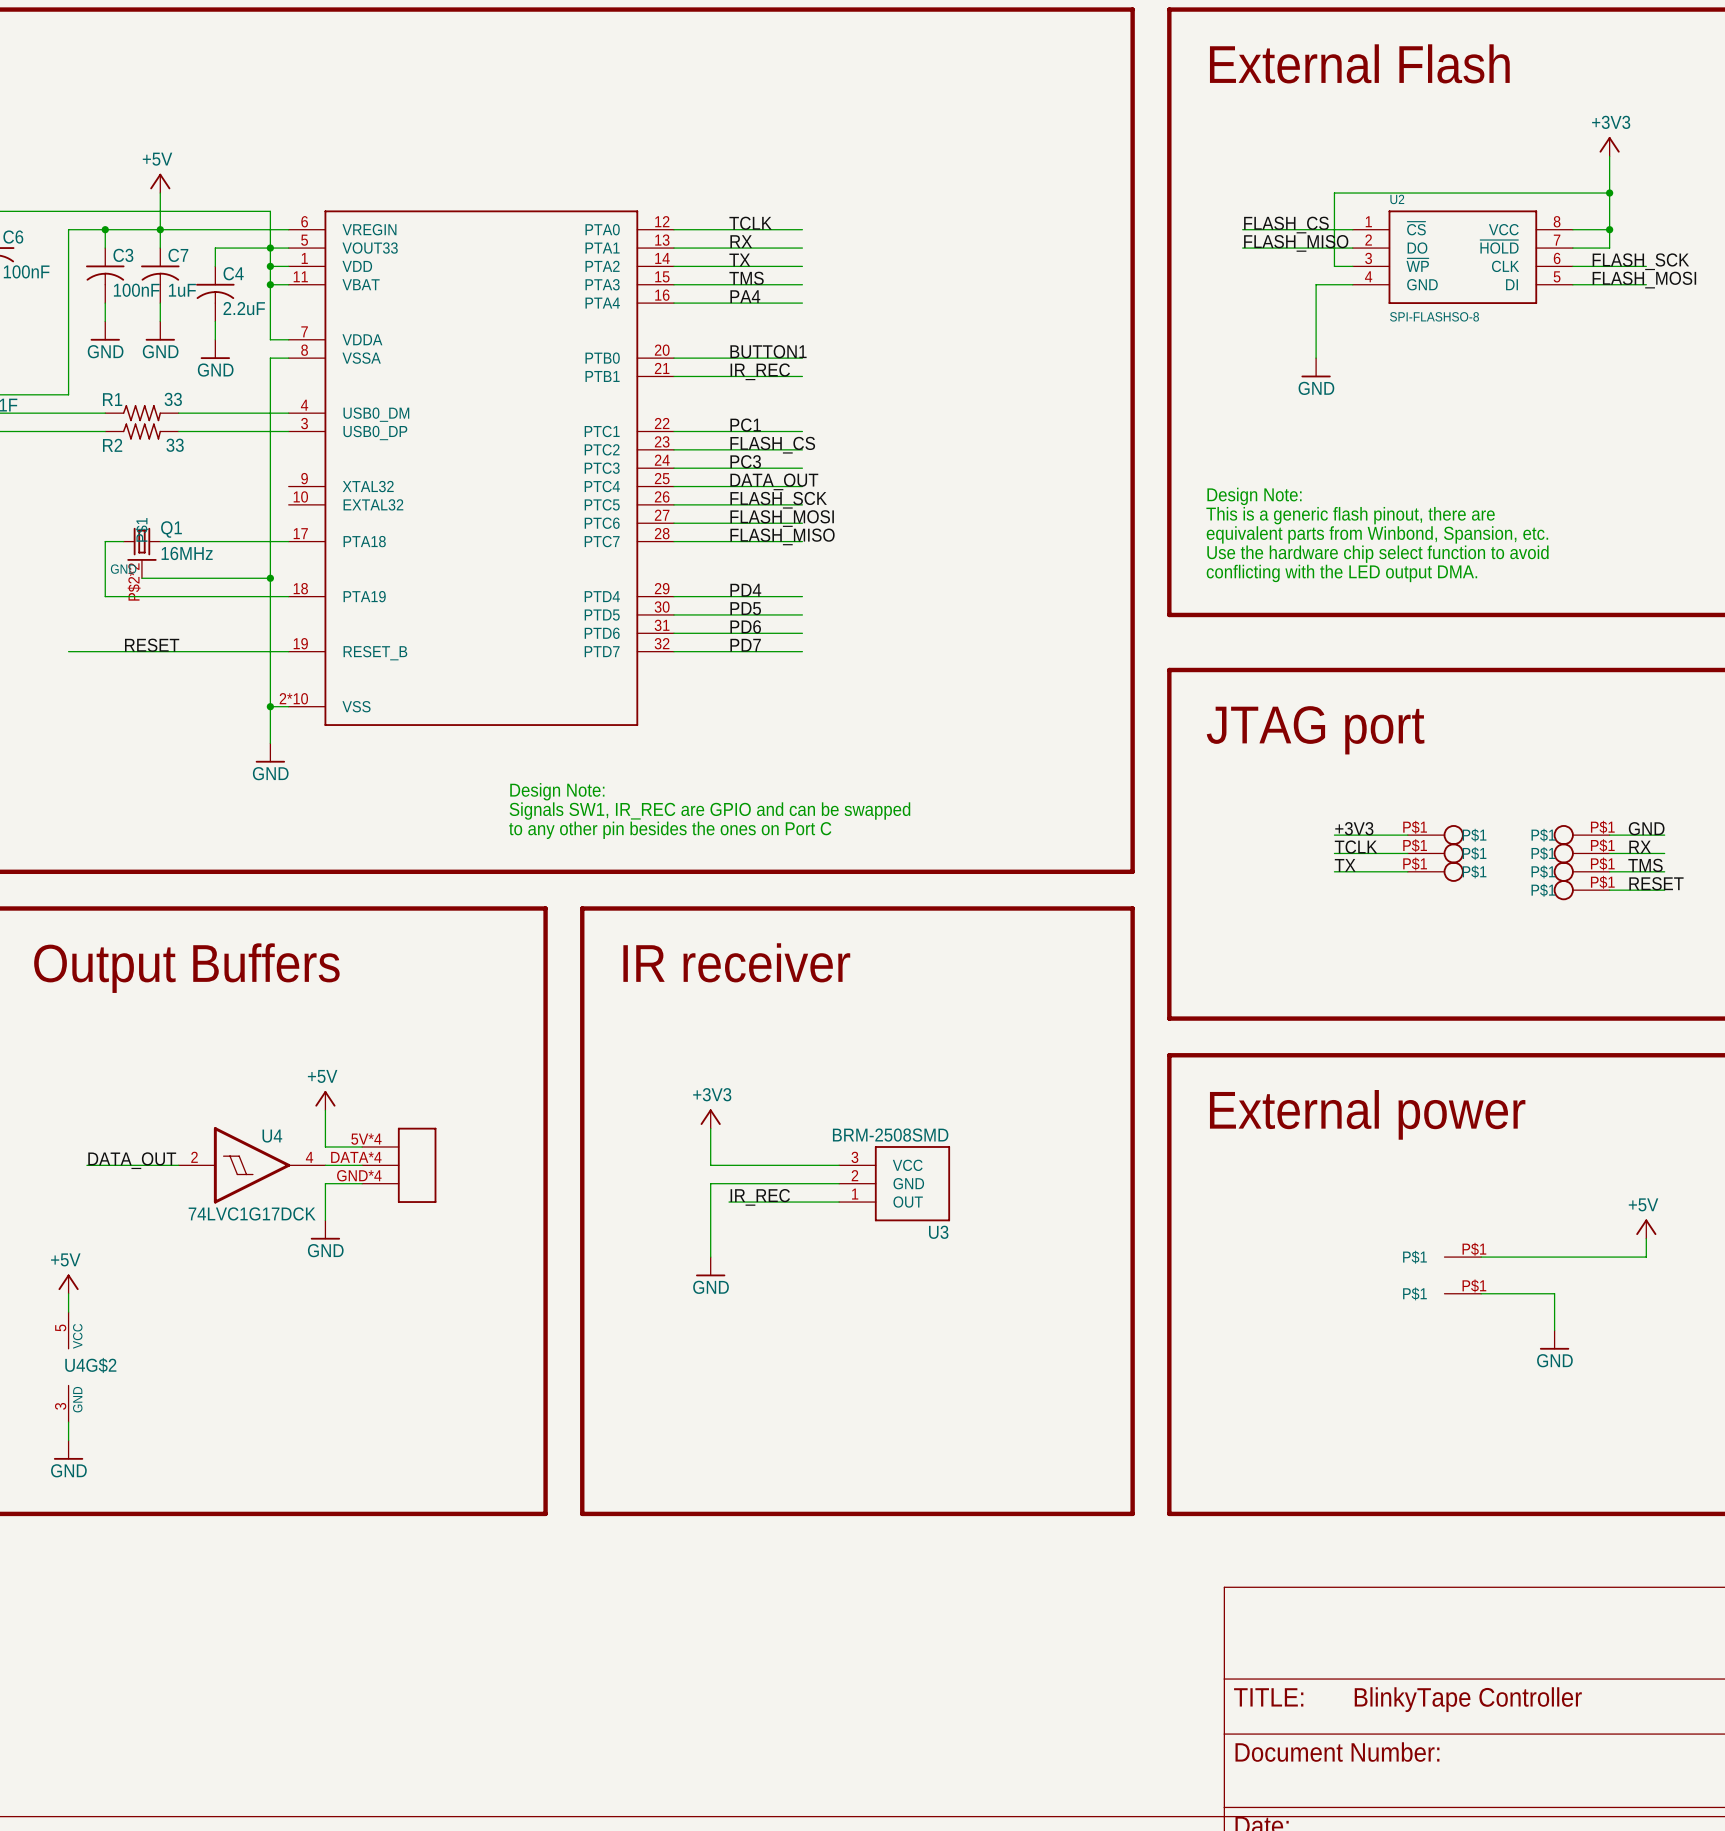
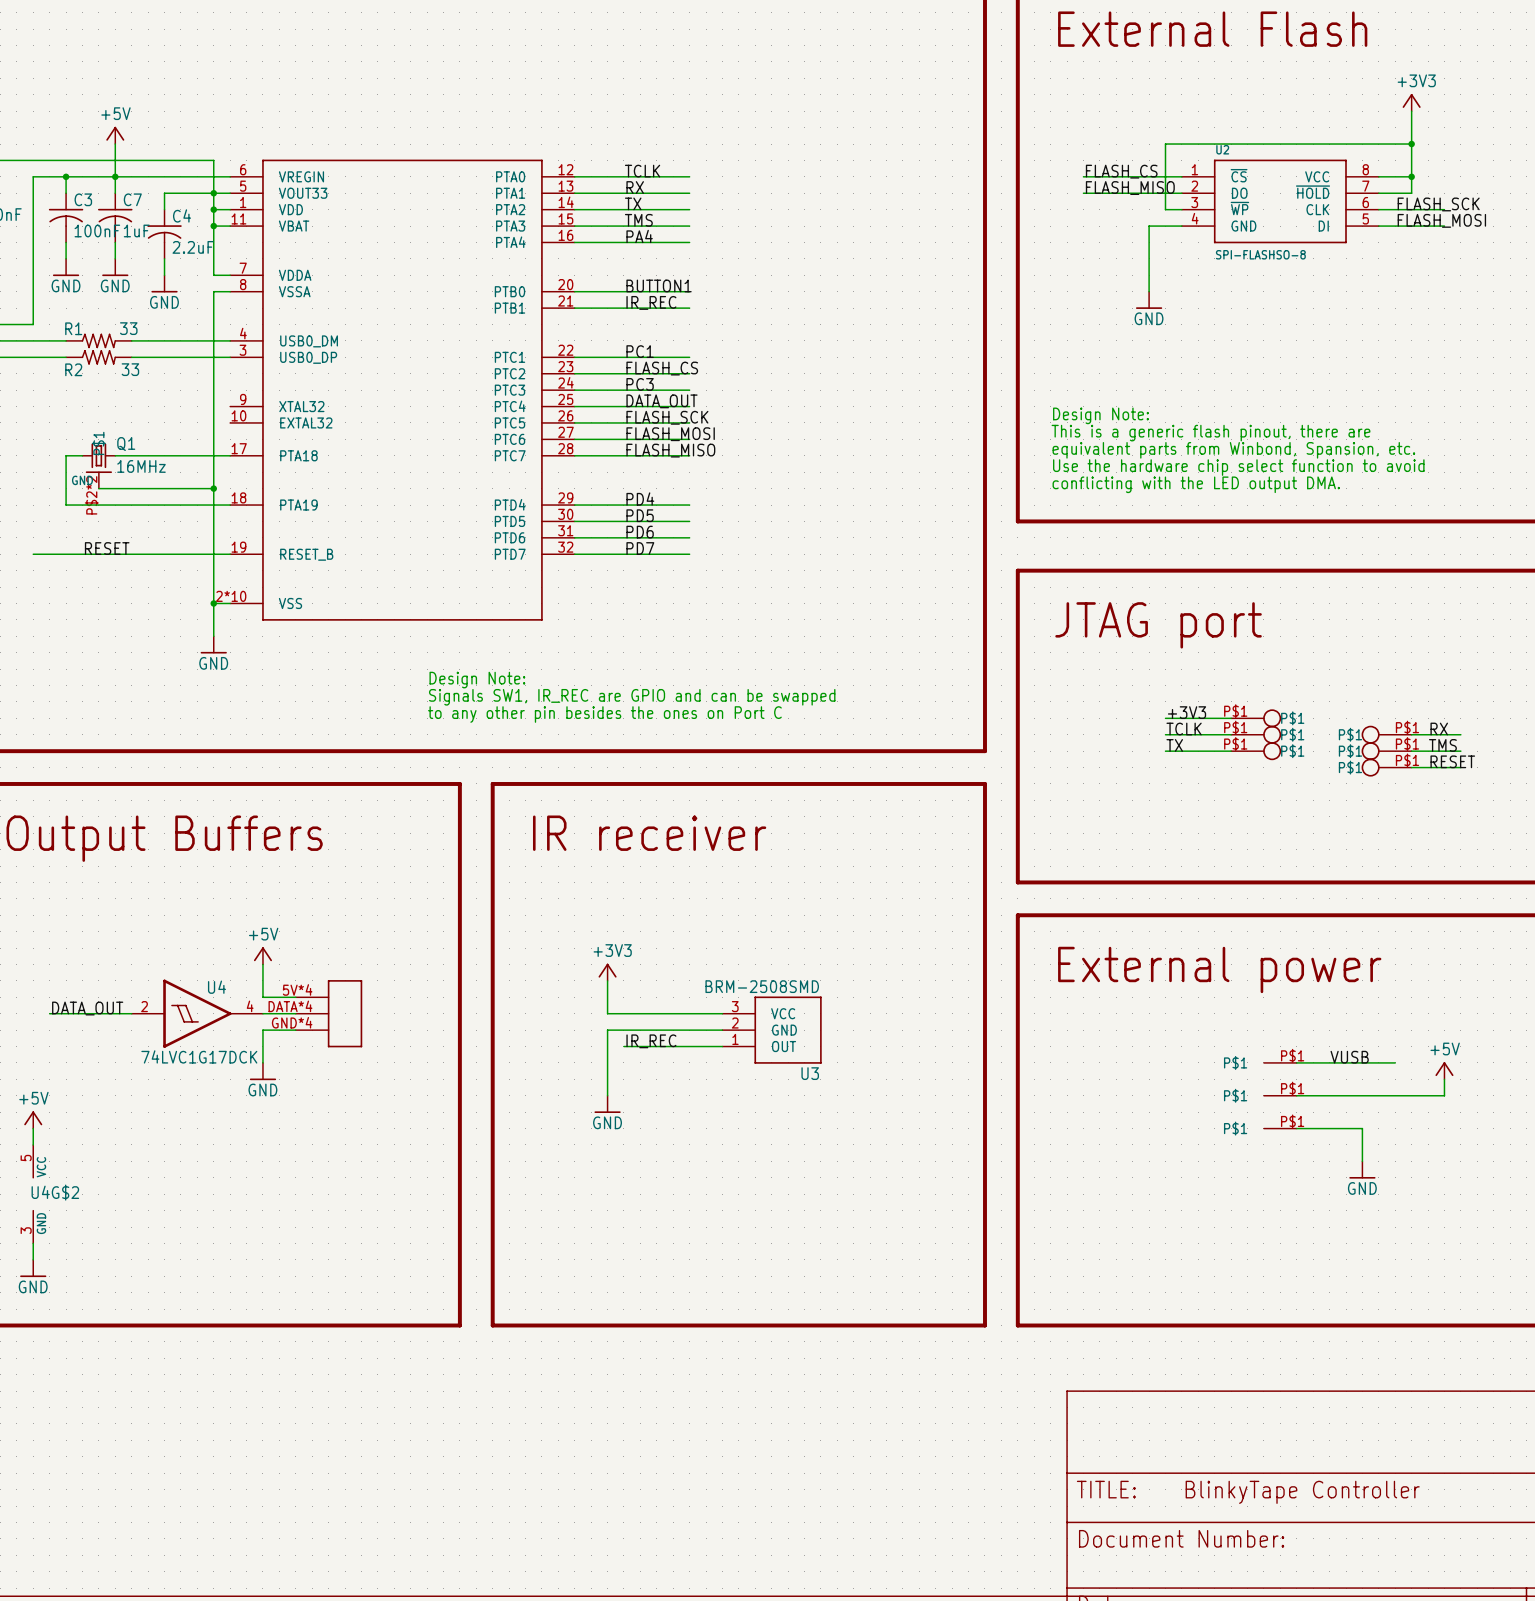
label: GND (1646, 828) -> none
part: (1581, 835) -> none
wire: (1609, 835) (1664, 835) -> none
label: none -> VUSB (1349, 1057)
part: none -> (1280, 1062)
wire: none -> (1296, 1062) (1395, 1062)

